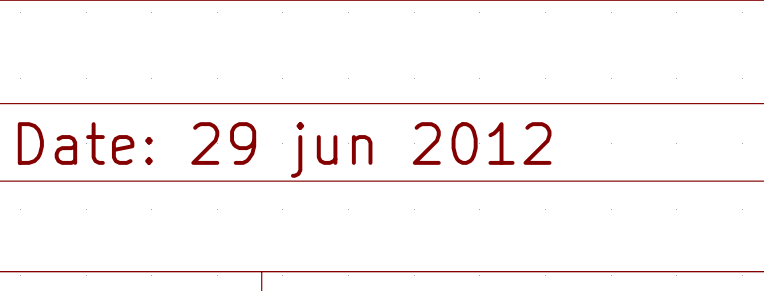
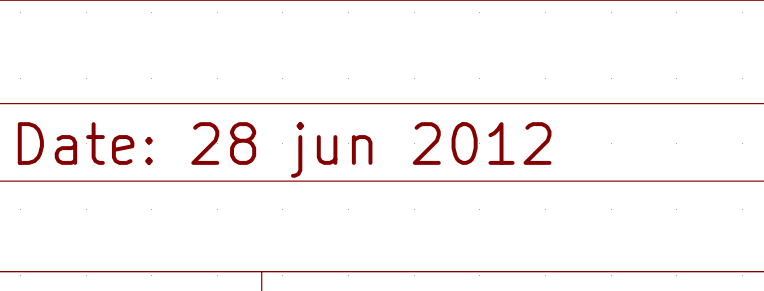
title block: Date: 29 jun 2012 (284, 149) -> Date: 28 jun 2012 (284, 149)

